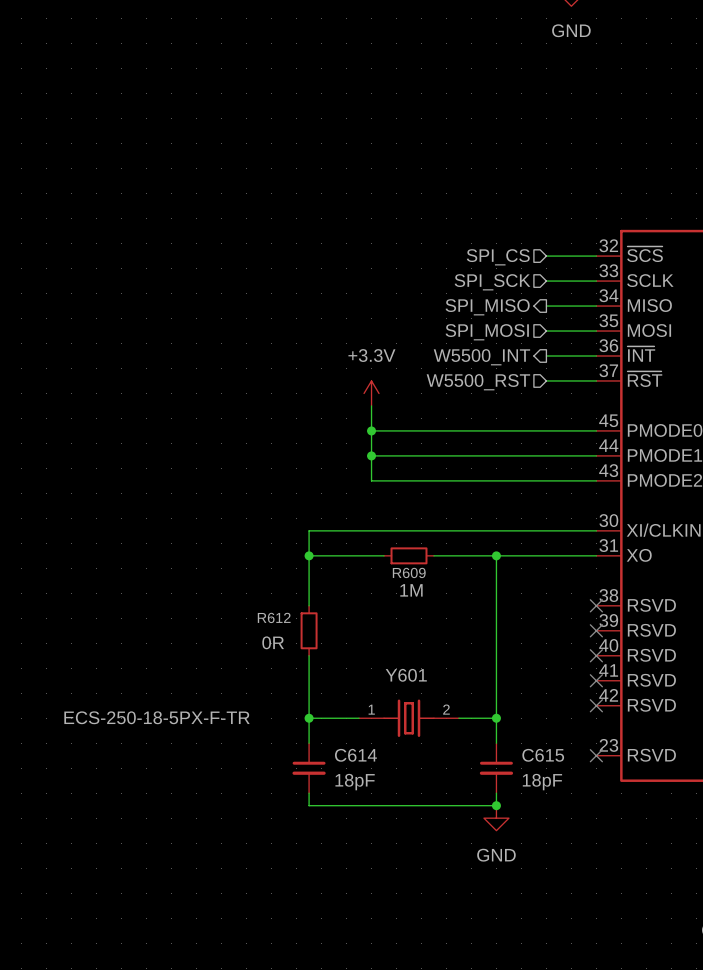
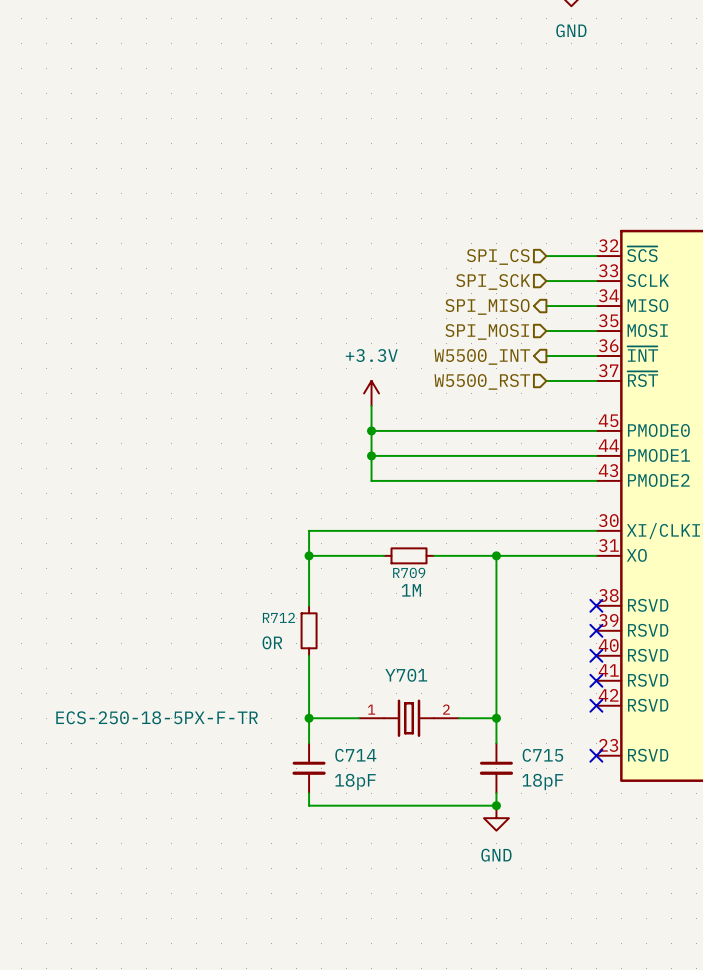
R609 name: R609 (409, 572) -> R709 (409, 572)
R612 name: R612 (274, 617) -> R712 (278, 617)
Y601 name: Y601 (406, 675) -> Y701 (406, 675)
C614 name: C614 (355, 755) -> C714 (355, 755)
C615 name: C615 (543, 755) -> C715 (542, 755)

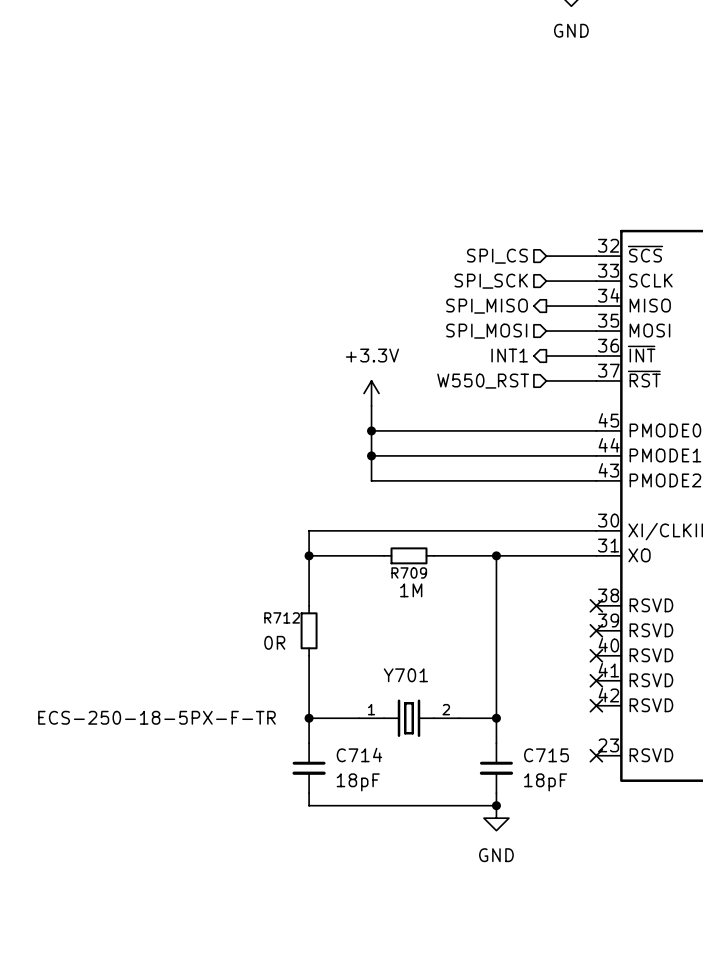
hierarchical label: W5500_INT (482, 356) -> INT1 (509, 355)
hierarchical label: W5500_RST (482, 381) -> W550_RST (483, 381)

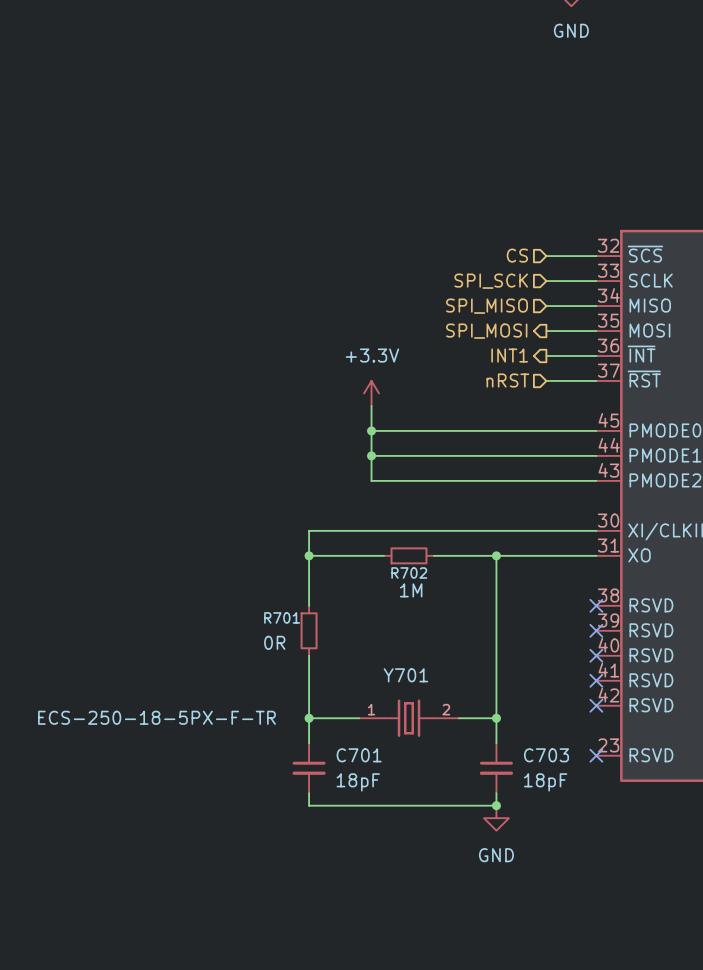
hierarchical label: SPI_CS (497, 256) -> CS (517, 255)
hierarchical label shape: output (487, 306) -> input (487, 306)
hierarchical label shape: input (486, 331) -> output (486, 331)
hierarchical label: W550_RST (483, 381) -> nRST (507, 380)
R709 name: R709 (409, 572) -> R702 (409, 572)
R712 name: R712 (282, 617) -> R701 (282, 617)
C714 name: C714 (359, 755) -> C701 (359, 755)
C715 name: C715 (546, 755) -> C703 (546, 755)

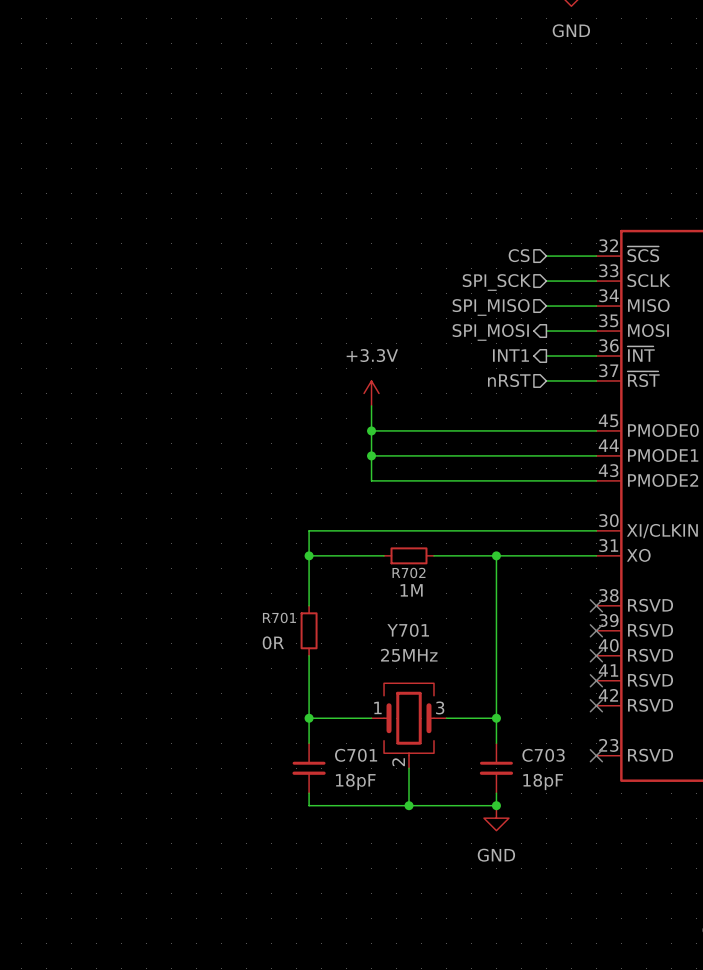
Y701 name position: Y701 (405, 675) -> Y701 (408, 630)
Y701 symbol: [359, 699, 459, 737] -> [371, 683, 447, 769]
Y701 value: ECS-250-18-5PX-F-TR (156, 717) -> 25MHz (409, 655)
wire: none -> (409, 768) (409, 805)
junction: none -> (409, 805)

